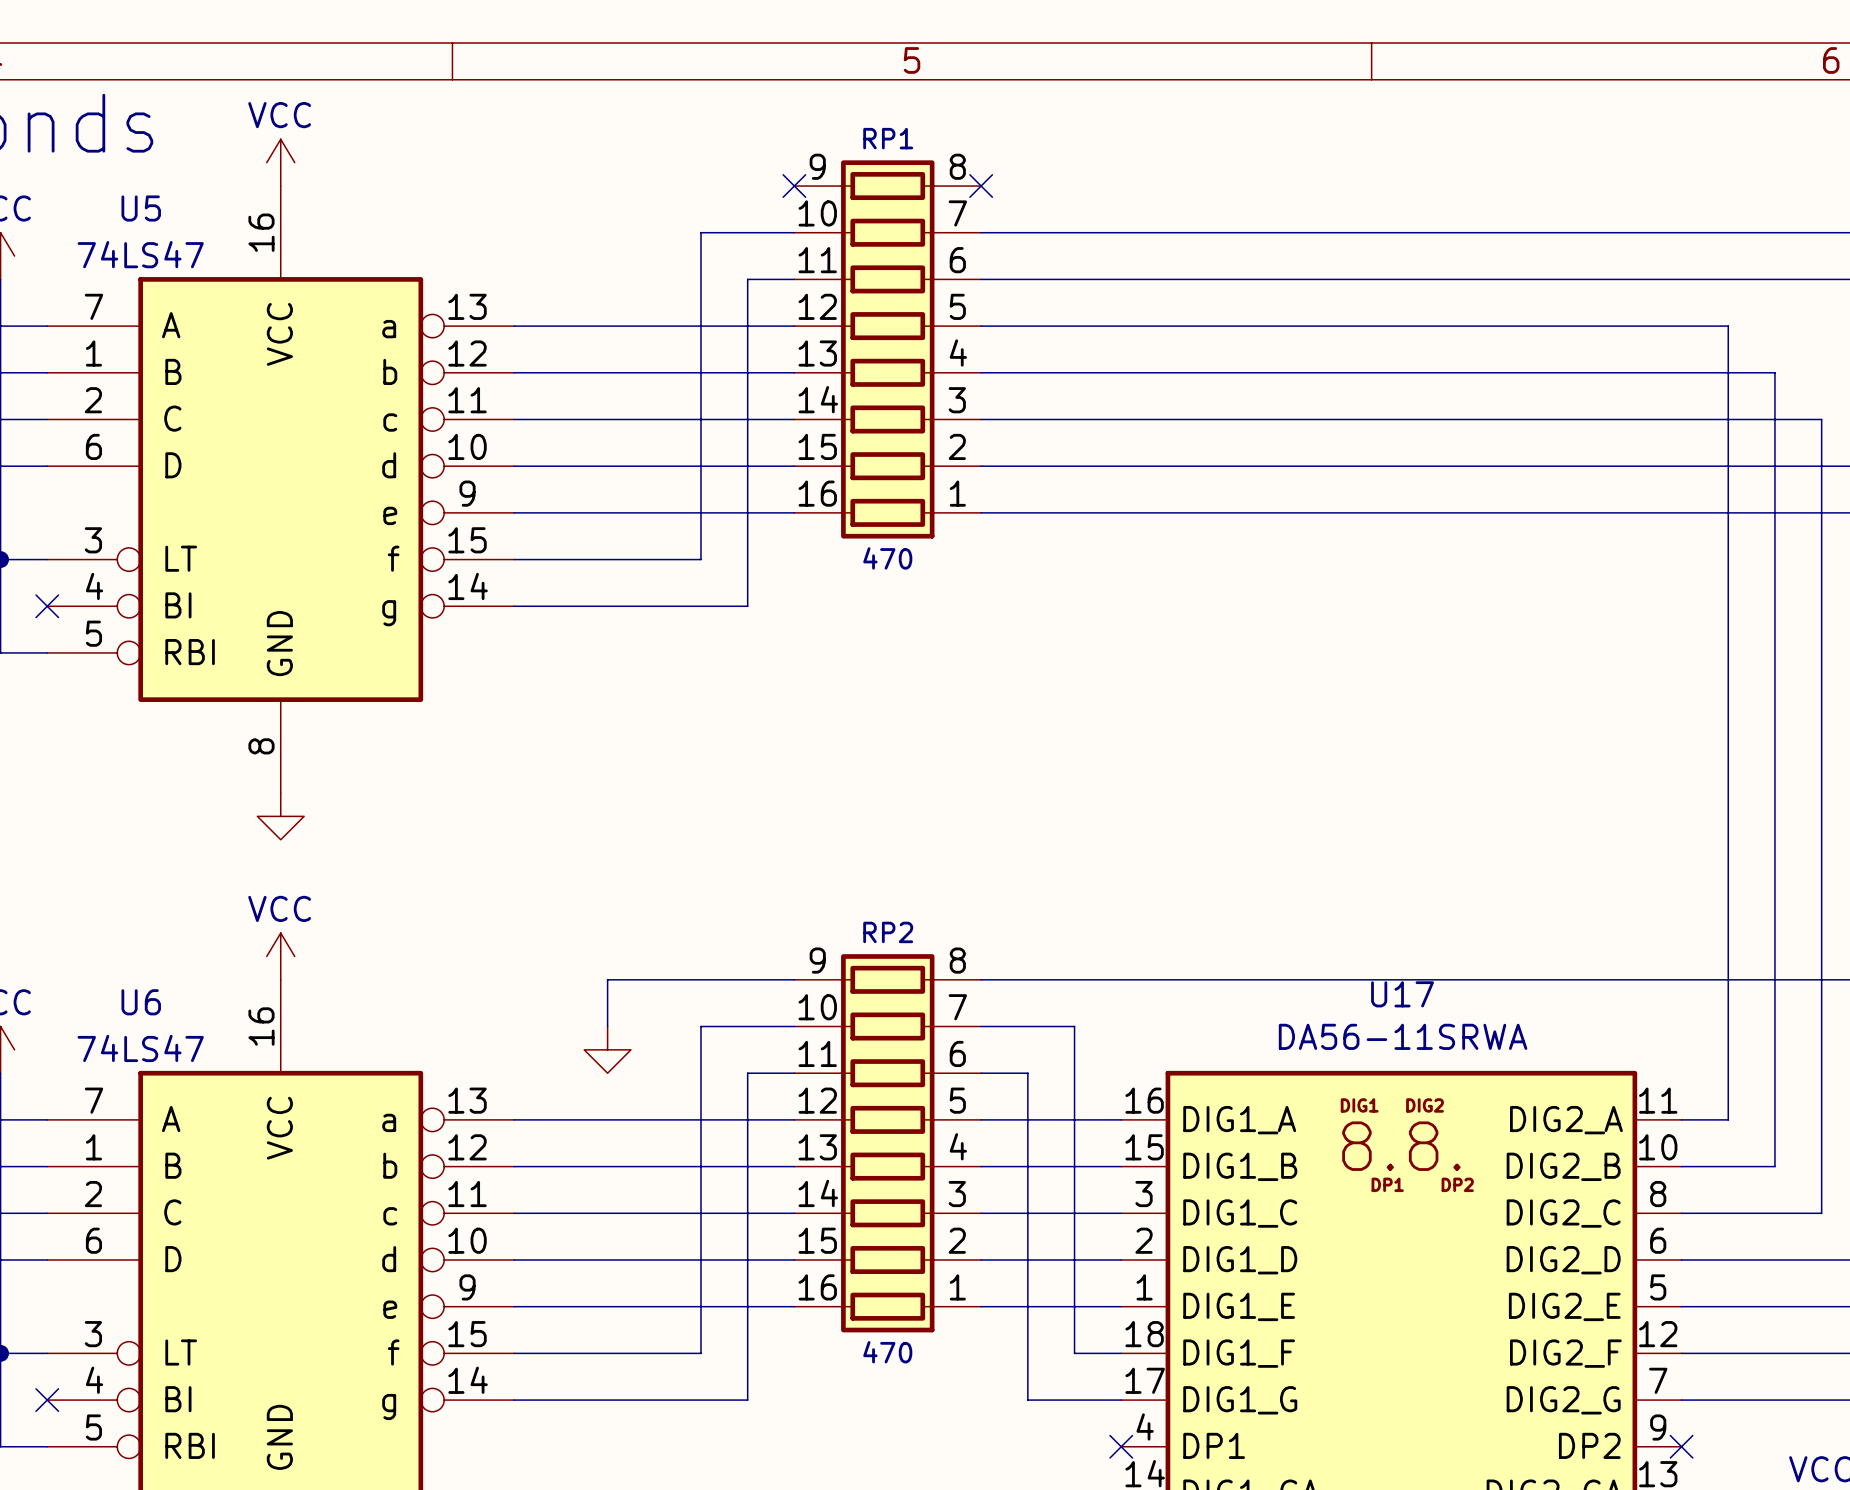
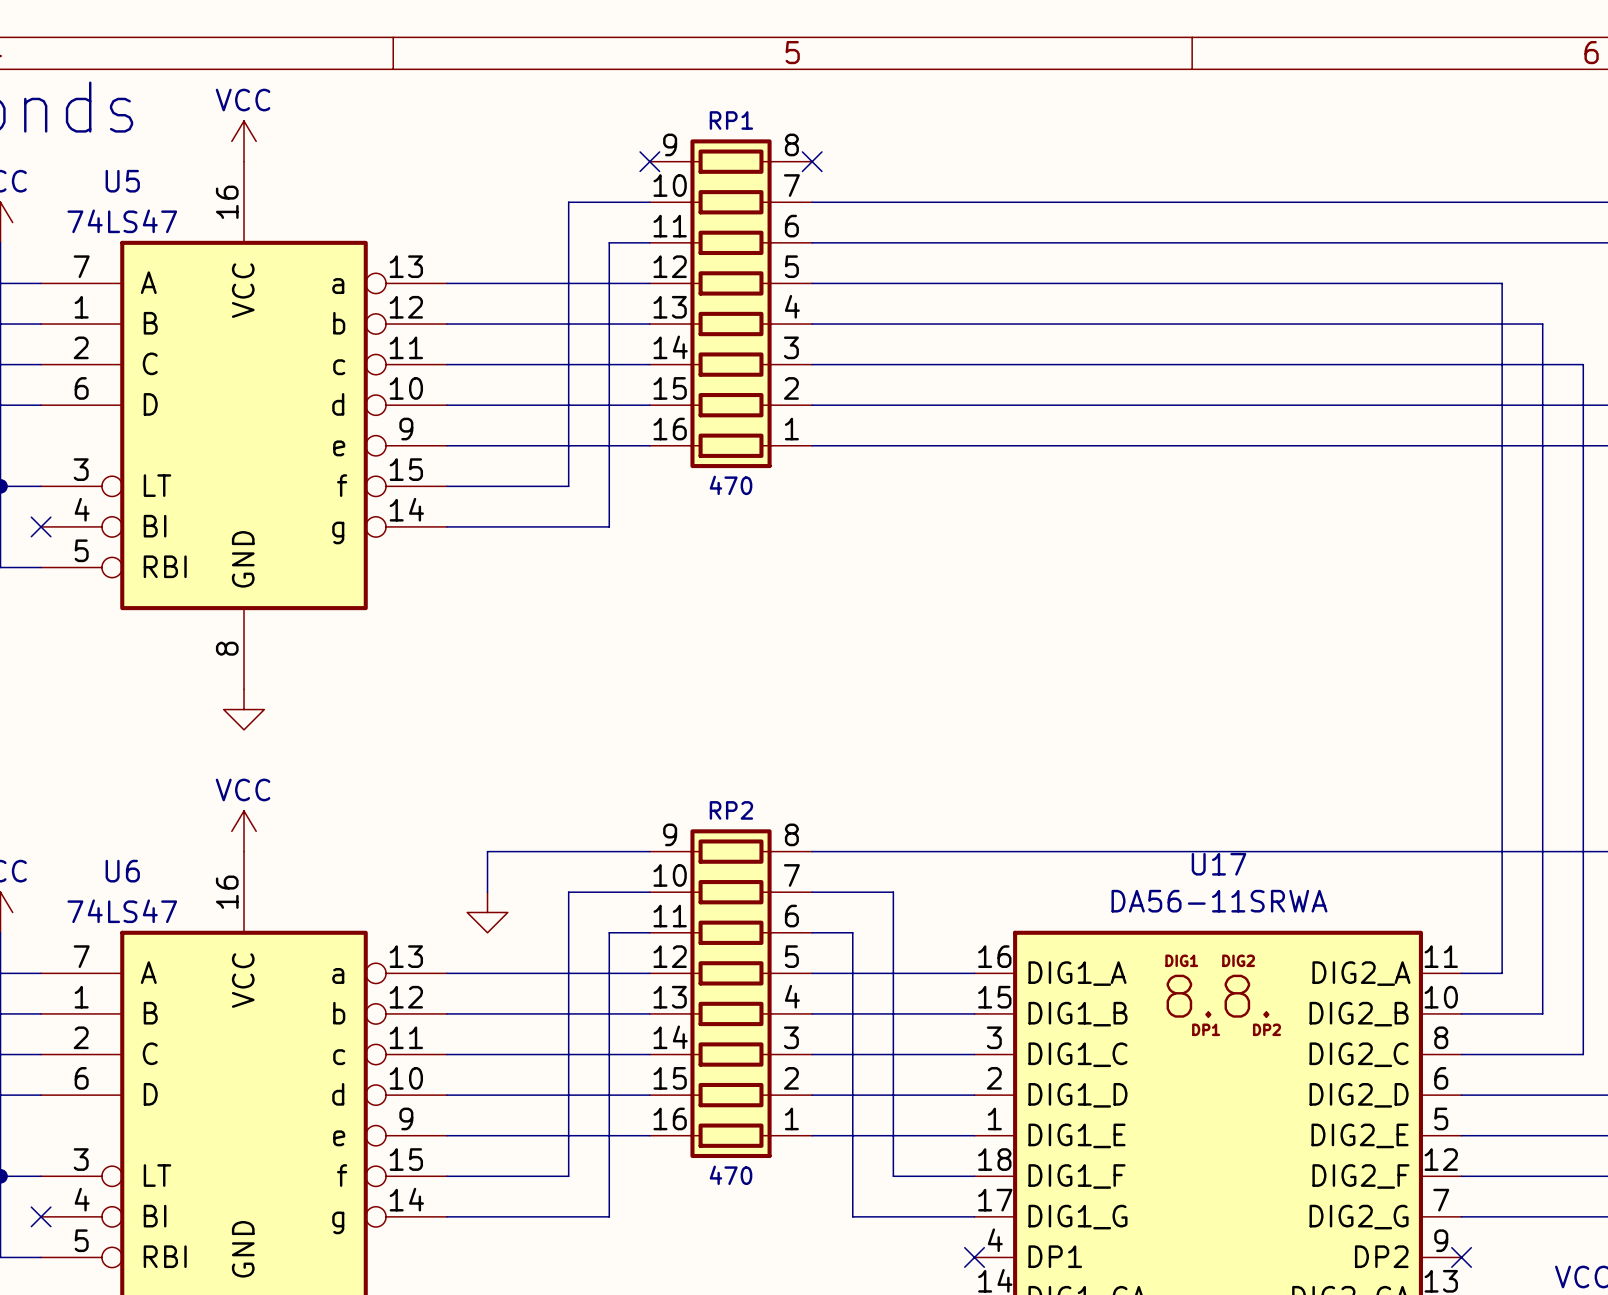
no-connect mark position: (794, 186) -> (649, 161)
no-connect mark position: (981, 186) -> (812, 161)
wire: (700, 232) (700, 279) -> (649, 242) (609, 242)
wire: none -> (609, 202) (568, 202) (568, 486)
wire: (794, 279) (747, 279) (747, 606) (700, 606) -> none
RP1 position: (887, 349) -> (731, 303)
wire: (654, 559) (700, 559) -> (609, 526) (609, 486)
wire: (607, 979) (607, 1026) -> (528, 851) (487, 851) (487, 892)
wire: (700, 1026) (700, 1073) -> (649, 932) (609, 932)
wire: none -> (609, 892) (568, 892) (568, 1176)
wire: (1027, 1026) (1074, 1026) (1074, 1353) -> none
power symbol position: (607, 1049) -> (487, 912)
wire: (794, 1073) (747, 1073) (747, 1400) (700, 1400) -> none
wire: none -> (812, 932) (852, 932) (852, 1216) (893, 1216)
wire: (981, 1073) (1027, 1073) -> (893, 892) (893, 932)
RP2 position: (887, 1143) -> (731, 993)
wire: (654, 1353) (700, 1353) -> (609, 1216) (609, 1176)
wire: (1027, 1353) (1027, 1400) -> (893, 1176) (933, 1176)

